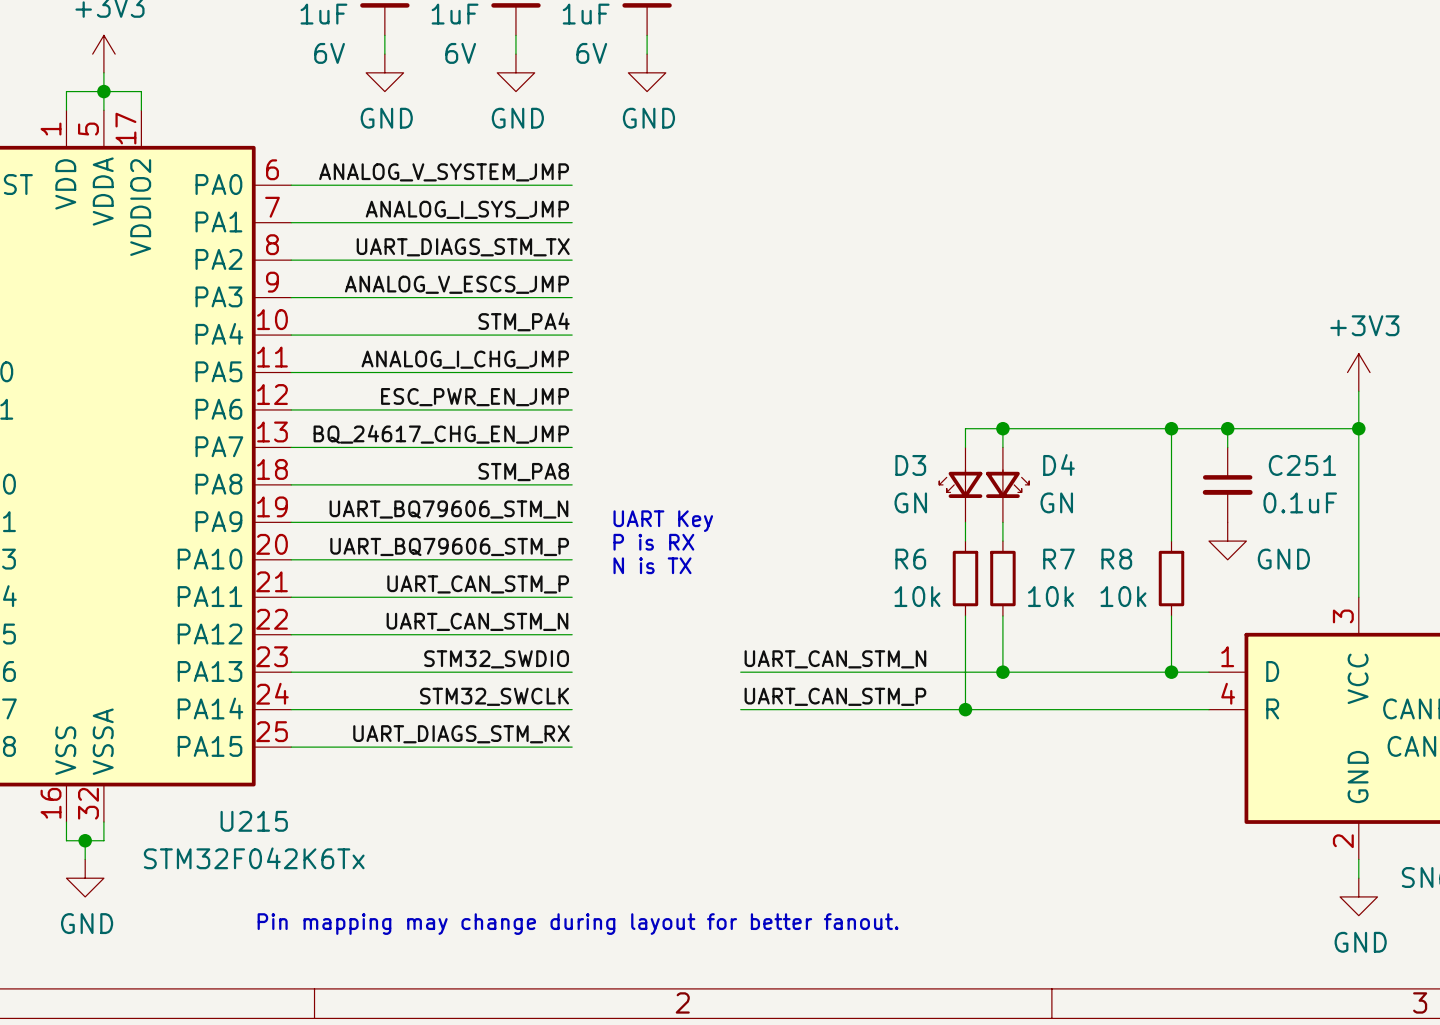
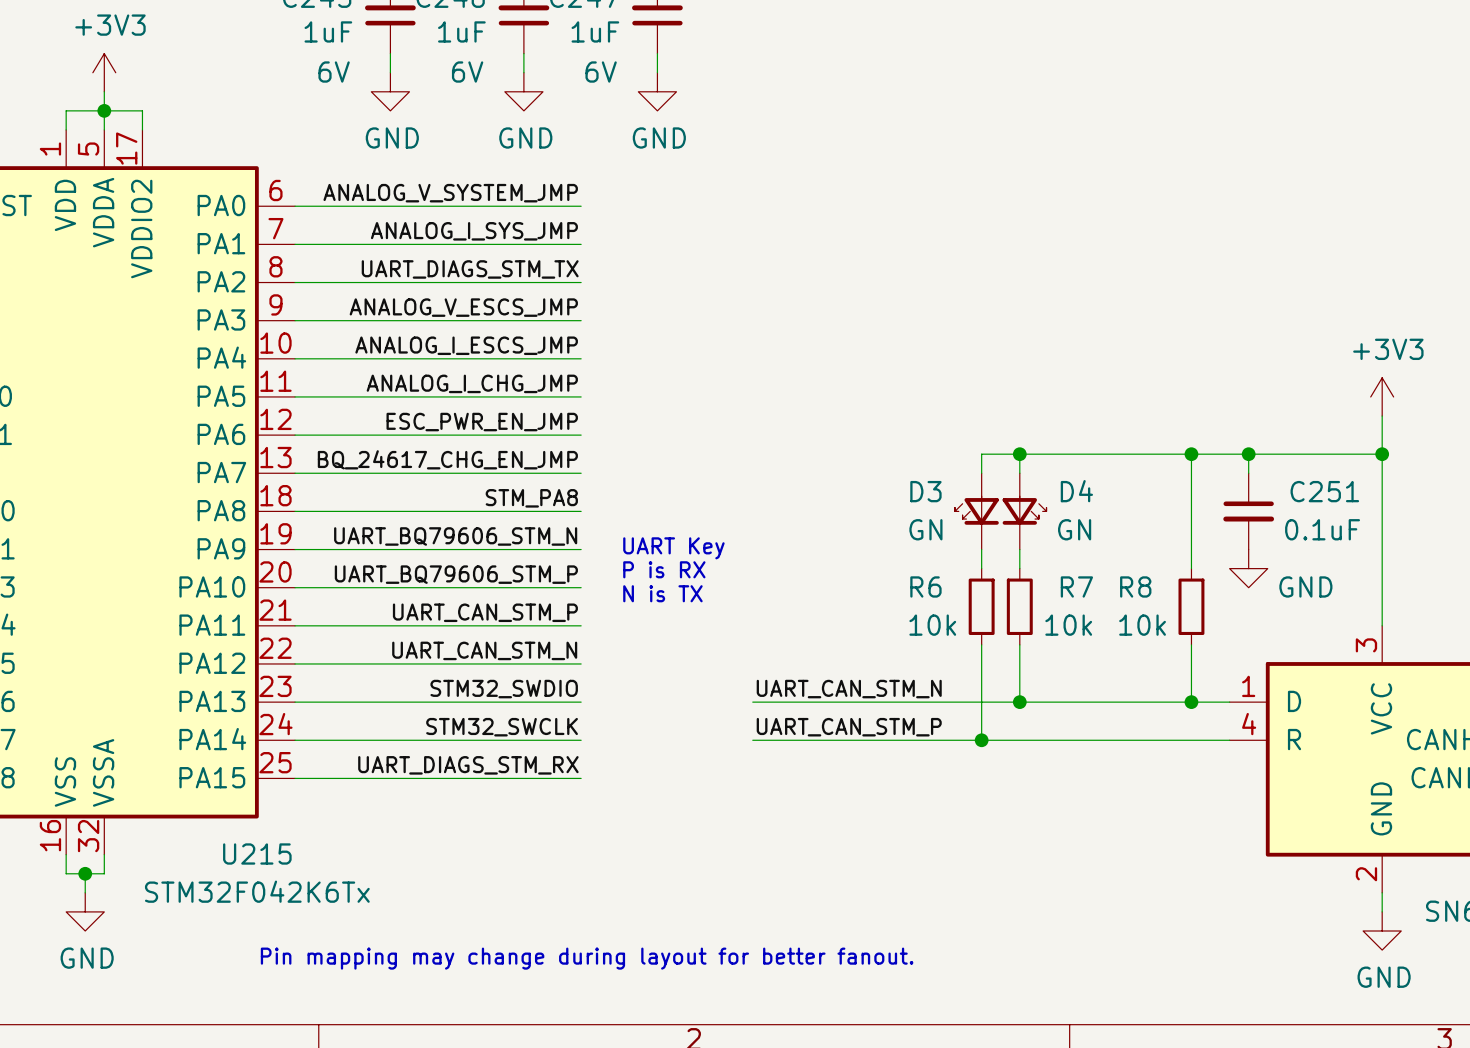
label: STM_PA4 (524, 321) -> ANALOG_I_ESCS_JMP (466, 345)

